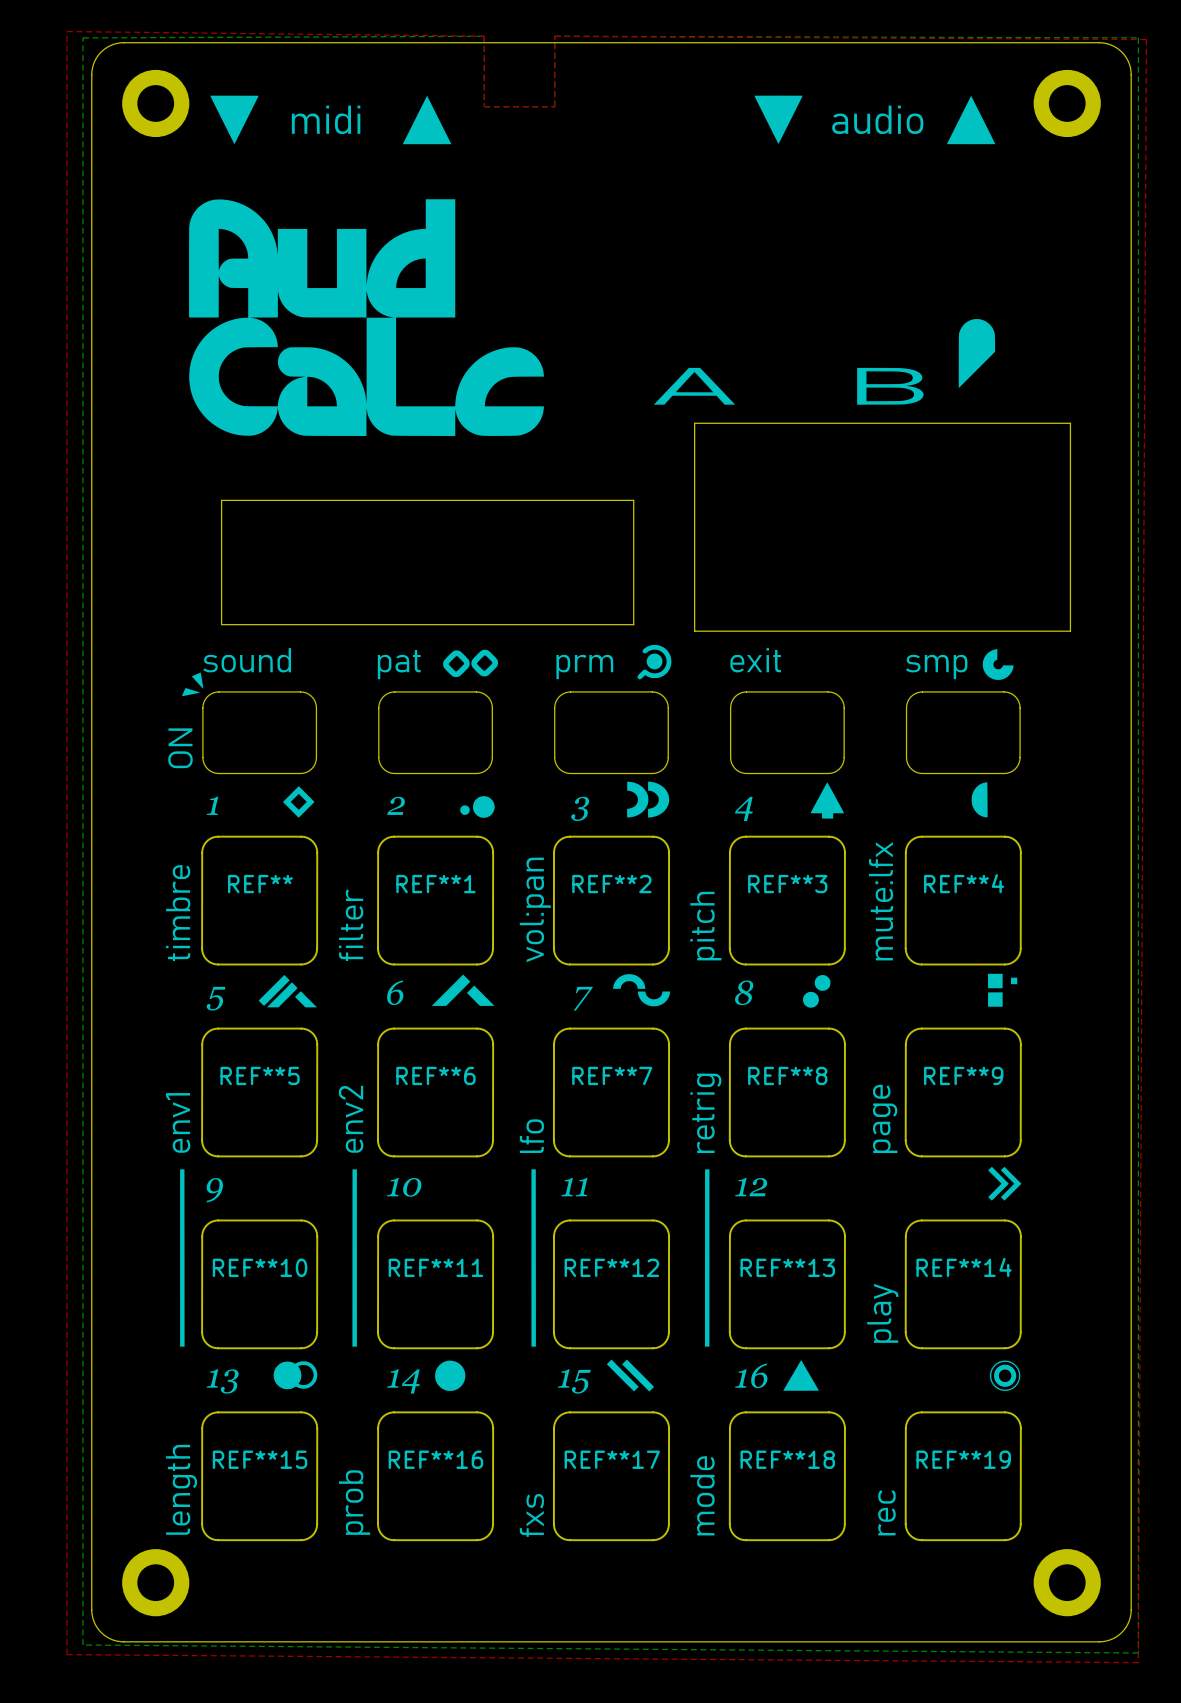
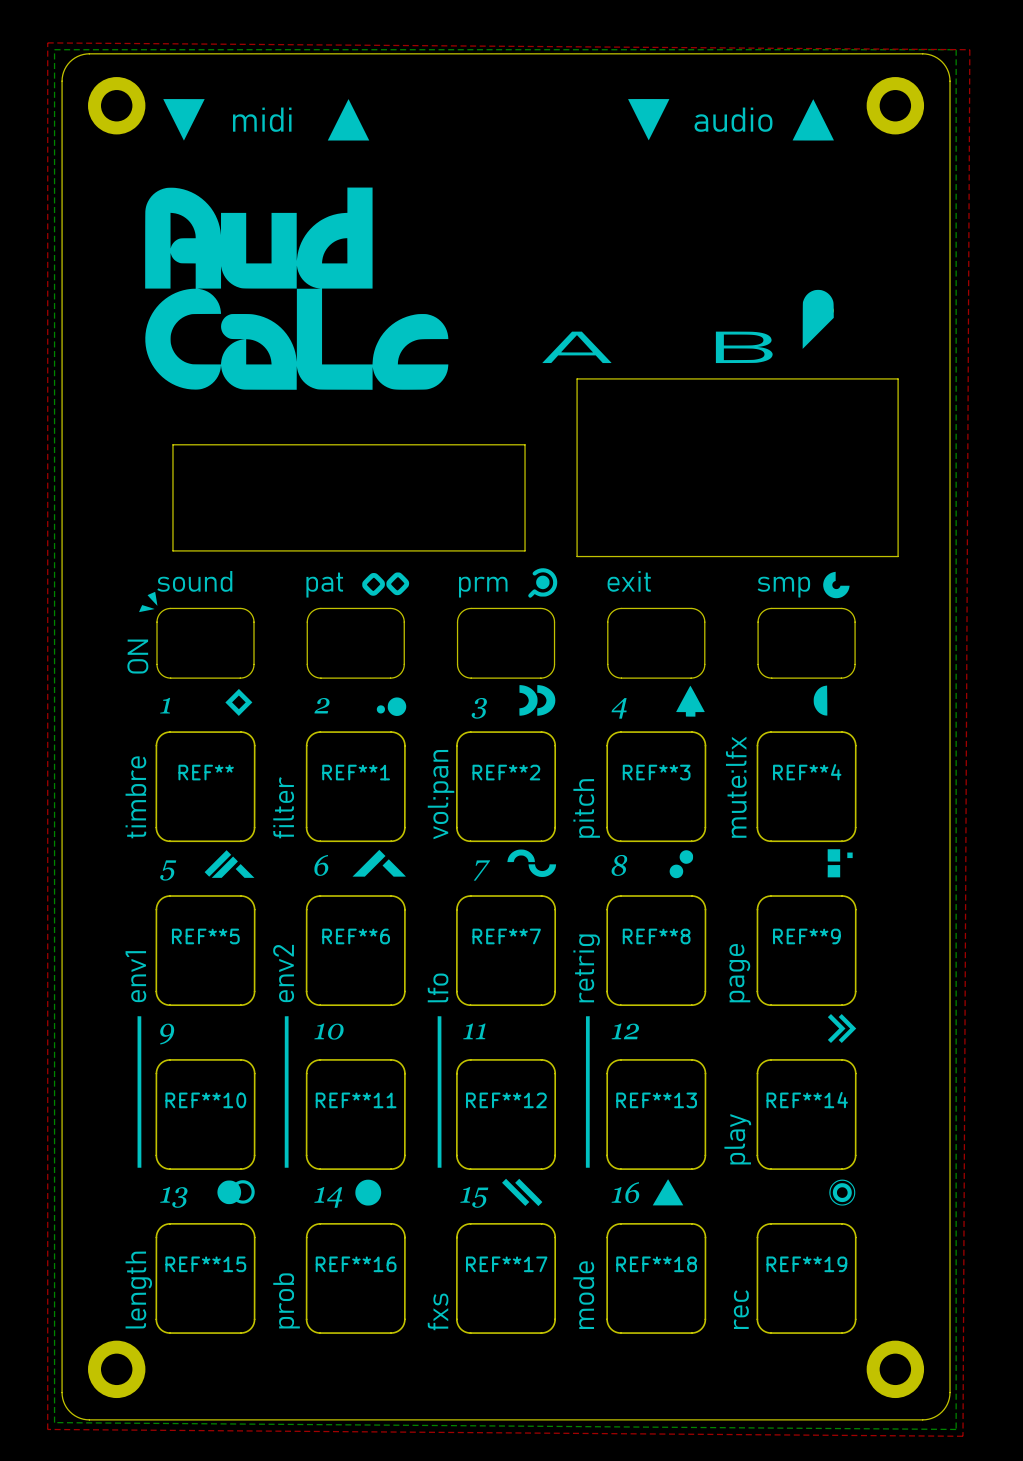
top zone outline: (66, 31) (66, 1654) (1138, 1662) (1146, 39) (554, 36) (554, 106) (484, 106) (484, 36) (66, 31) -> (47, 42) (47, 1429) (962, 1436) (969, 49) (47, 42)
bottom zone outline: (82, 37) (484, 36) (484, 106) (554, 106) (554, 36) (1138, 37) -> (54, 49) (956, 49)

